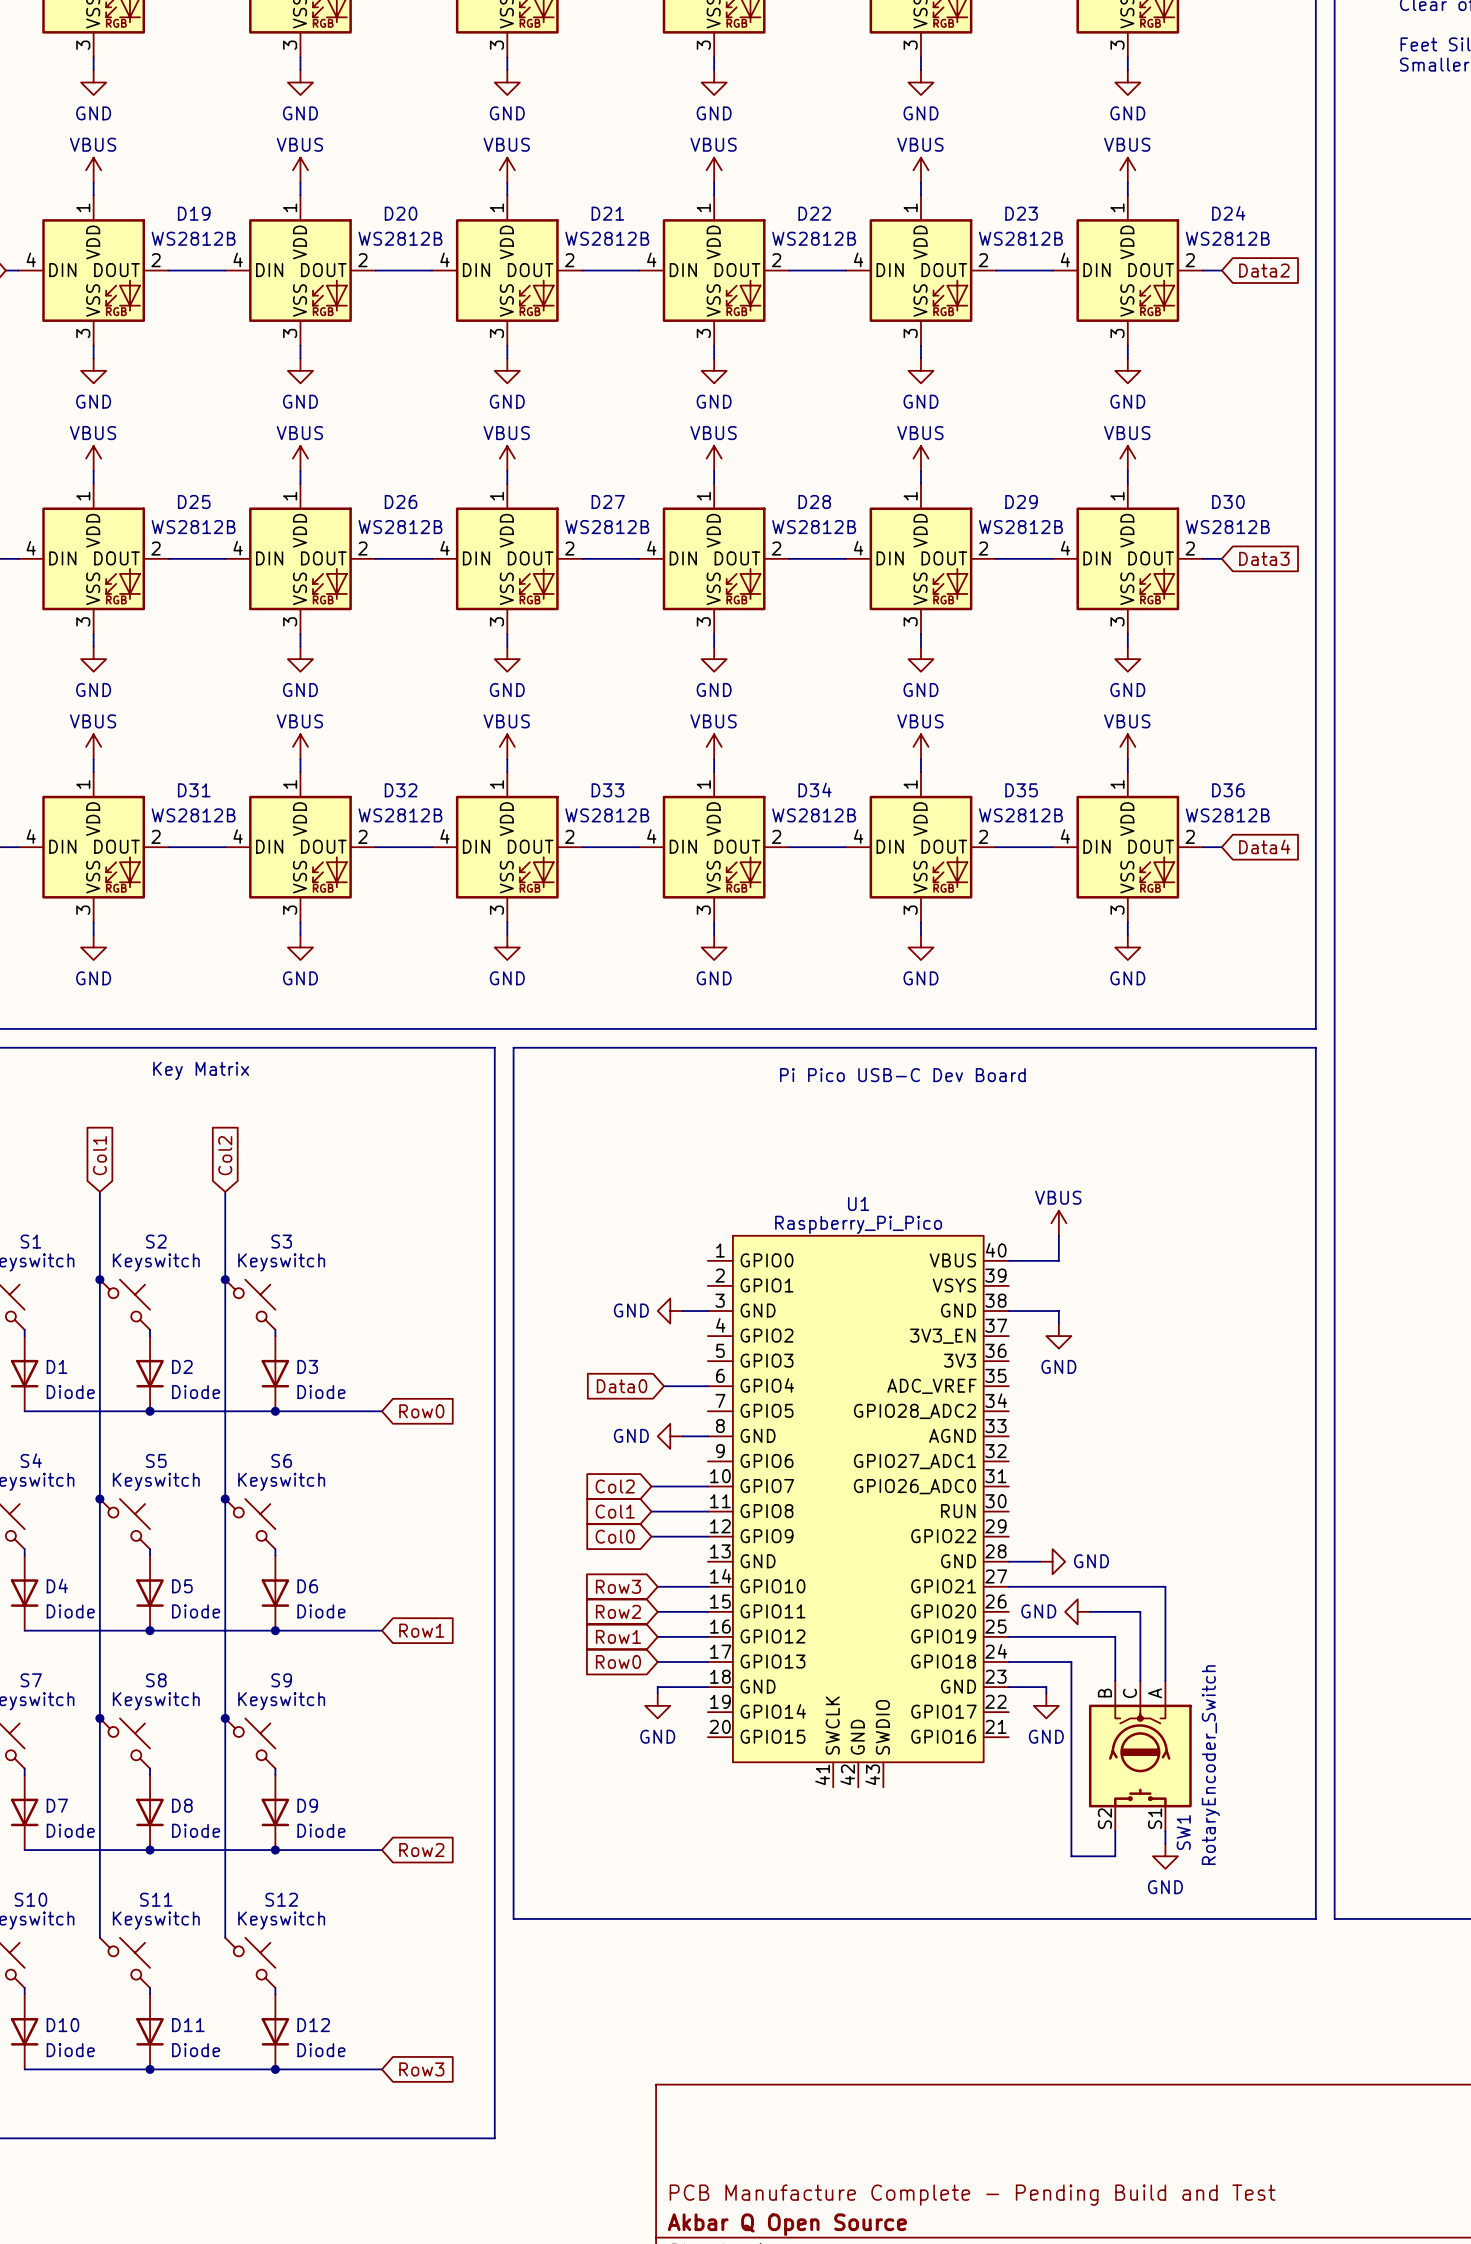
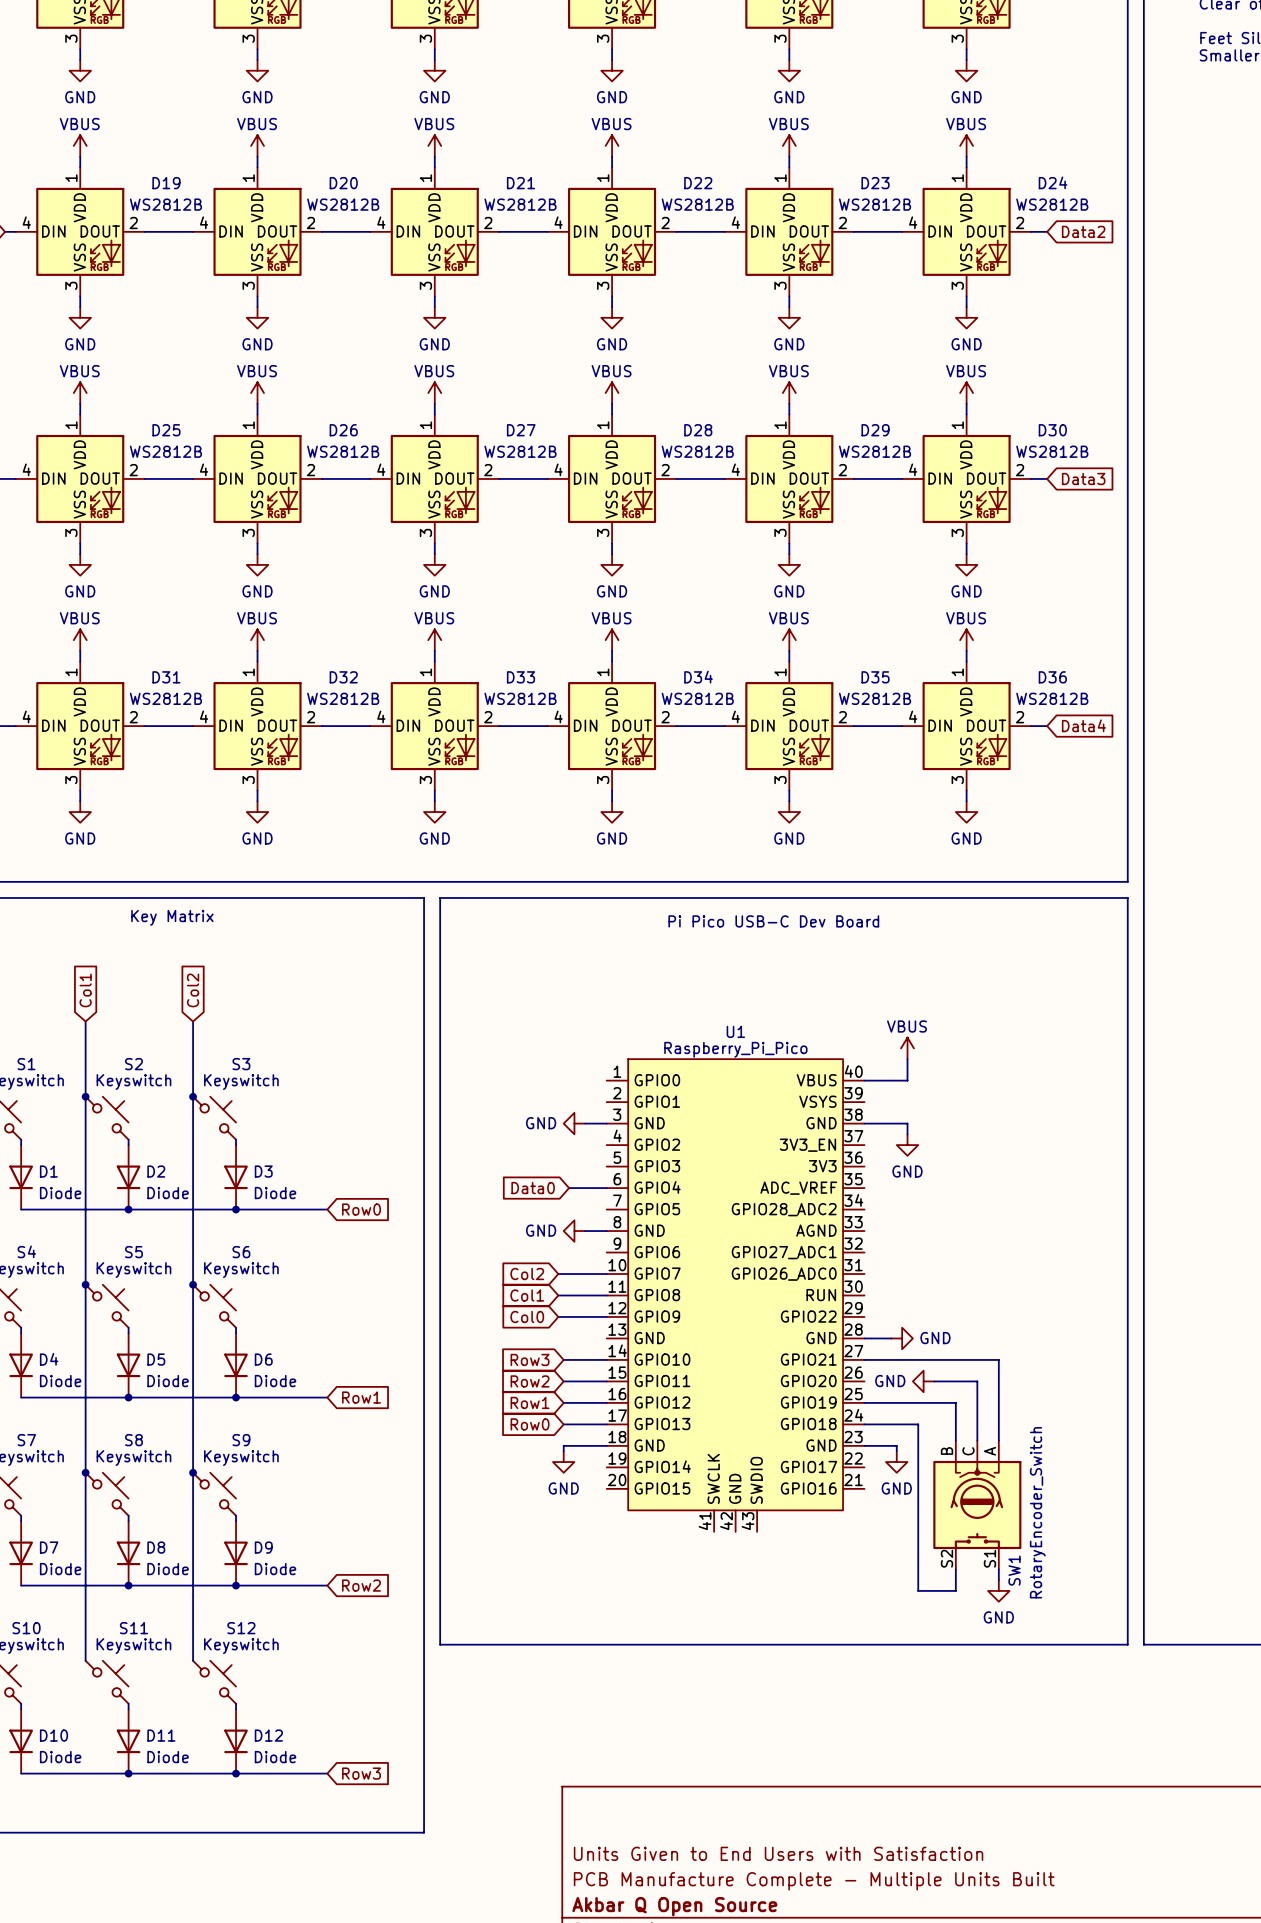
title block: none -> Units Given to End Users with Satisfaction (778, 1853)
title block: PCB Manufacture Complete - Pending Build and Test (972, 2195) -> PCB Manufacture Complete - Multiple Units Built (814, 1881)

